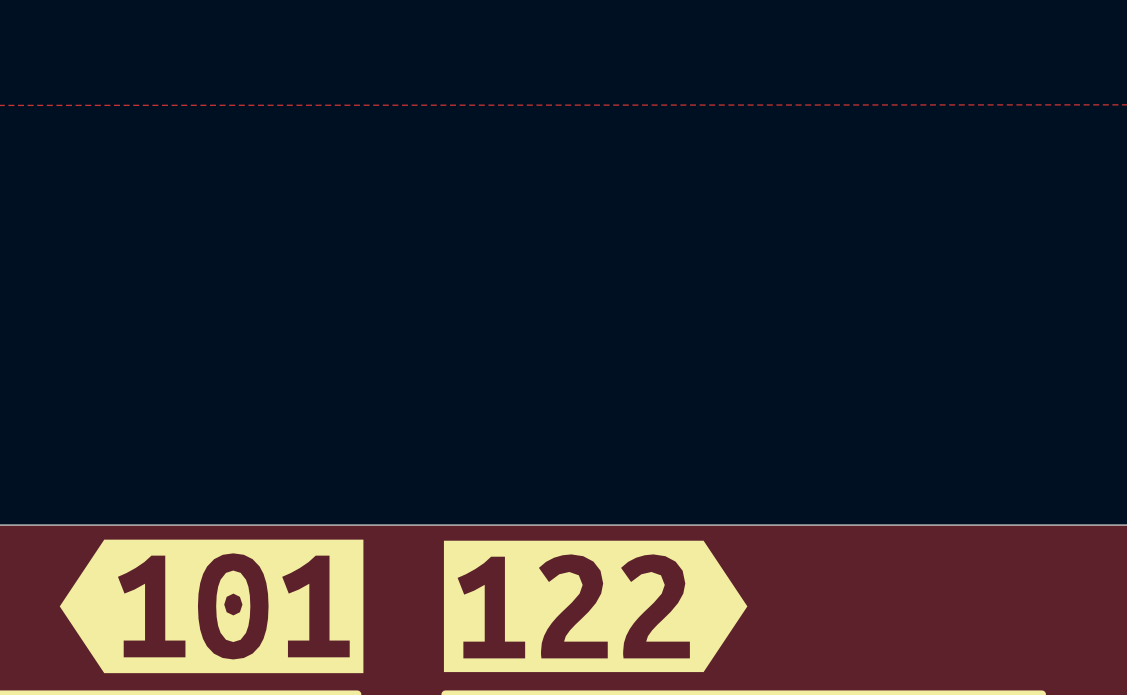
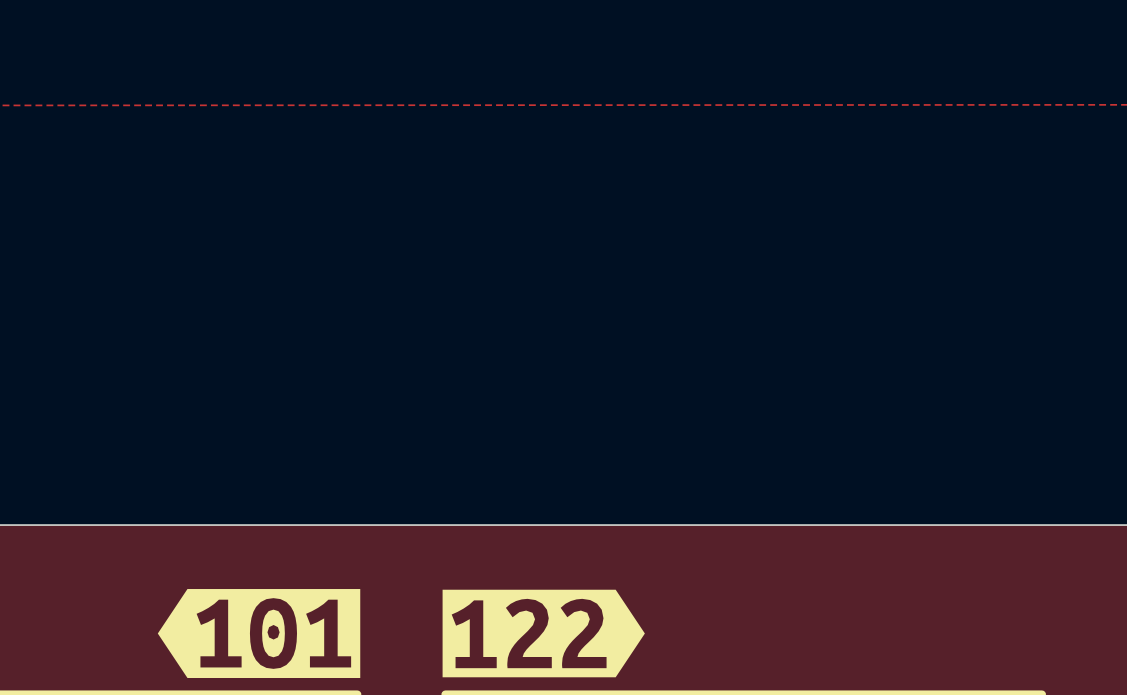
drawing shape: [59, 539, 364, 674] -> [157, 589, 361, 679]
drawing shape: [443, 540, 748, 673] -> [442, 589, 645, 678]

